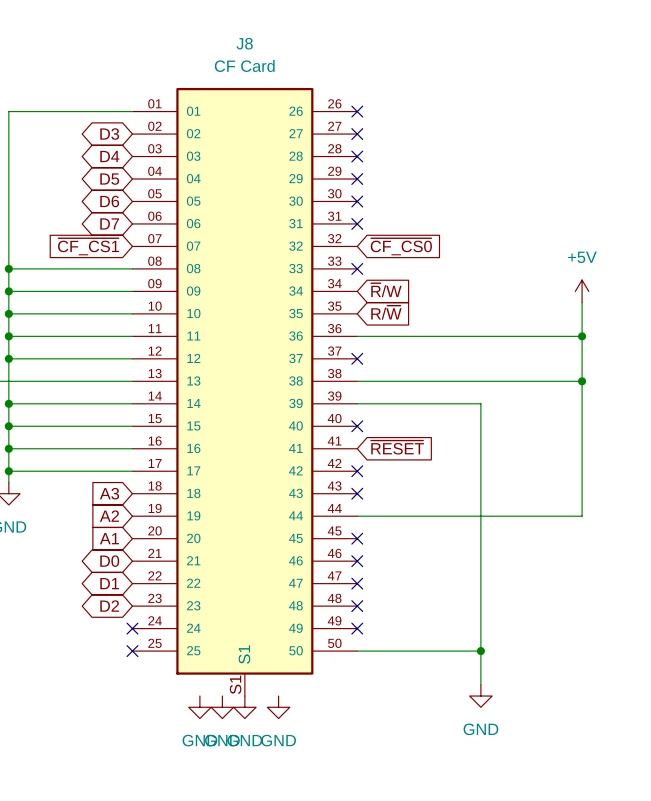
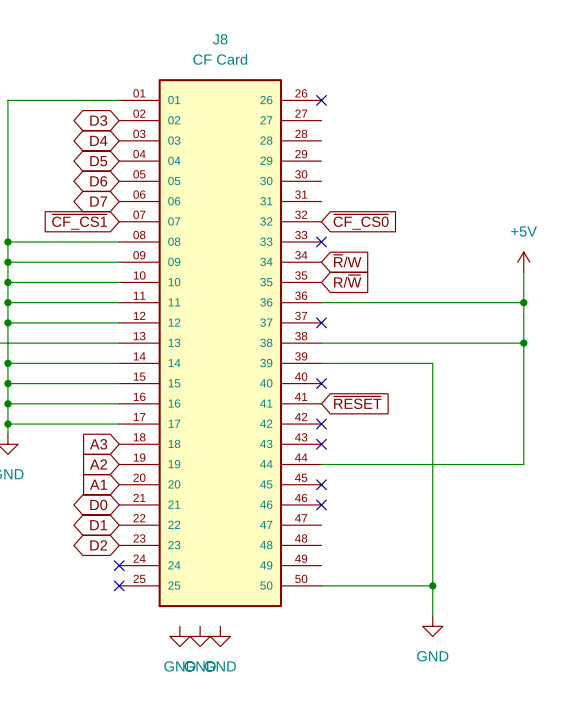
J8 symbol: [132, 87, 358, 697] -> [119, 79, 322, 608]
no-connect mark: (357, 134) -> none
no-connect mark: (357, 156) -> none
no-connect mark: (357, 179) -> none
no-connect mark: (357, 201) -> none
no-connect mark: (357, 223) -> none
no-connect mark: (357, 583) -> none
no-connect mark: (357, 606) -> none
no-connect mark: (357, 628) -> none
power symbol: GND (278, 707) -> none

